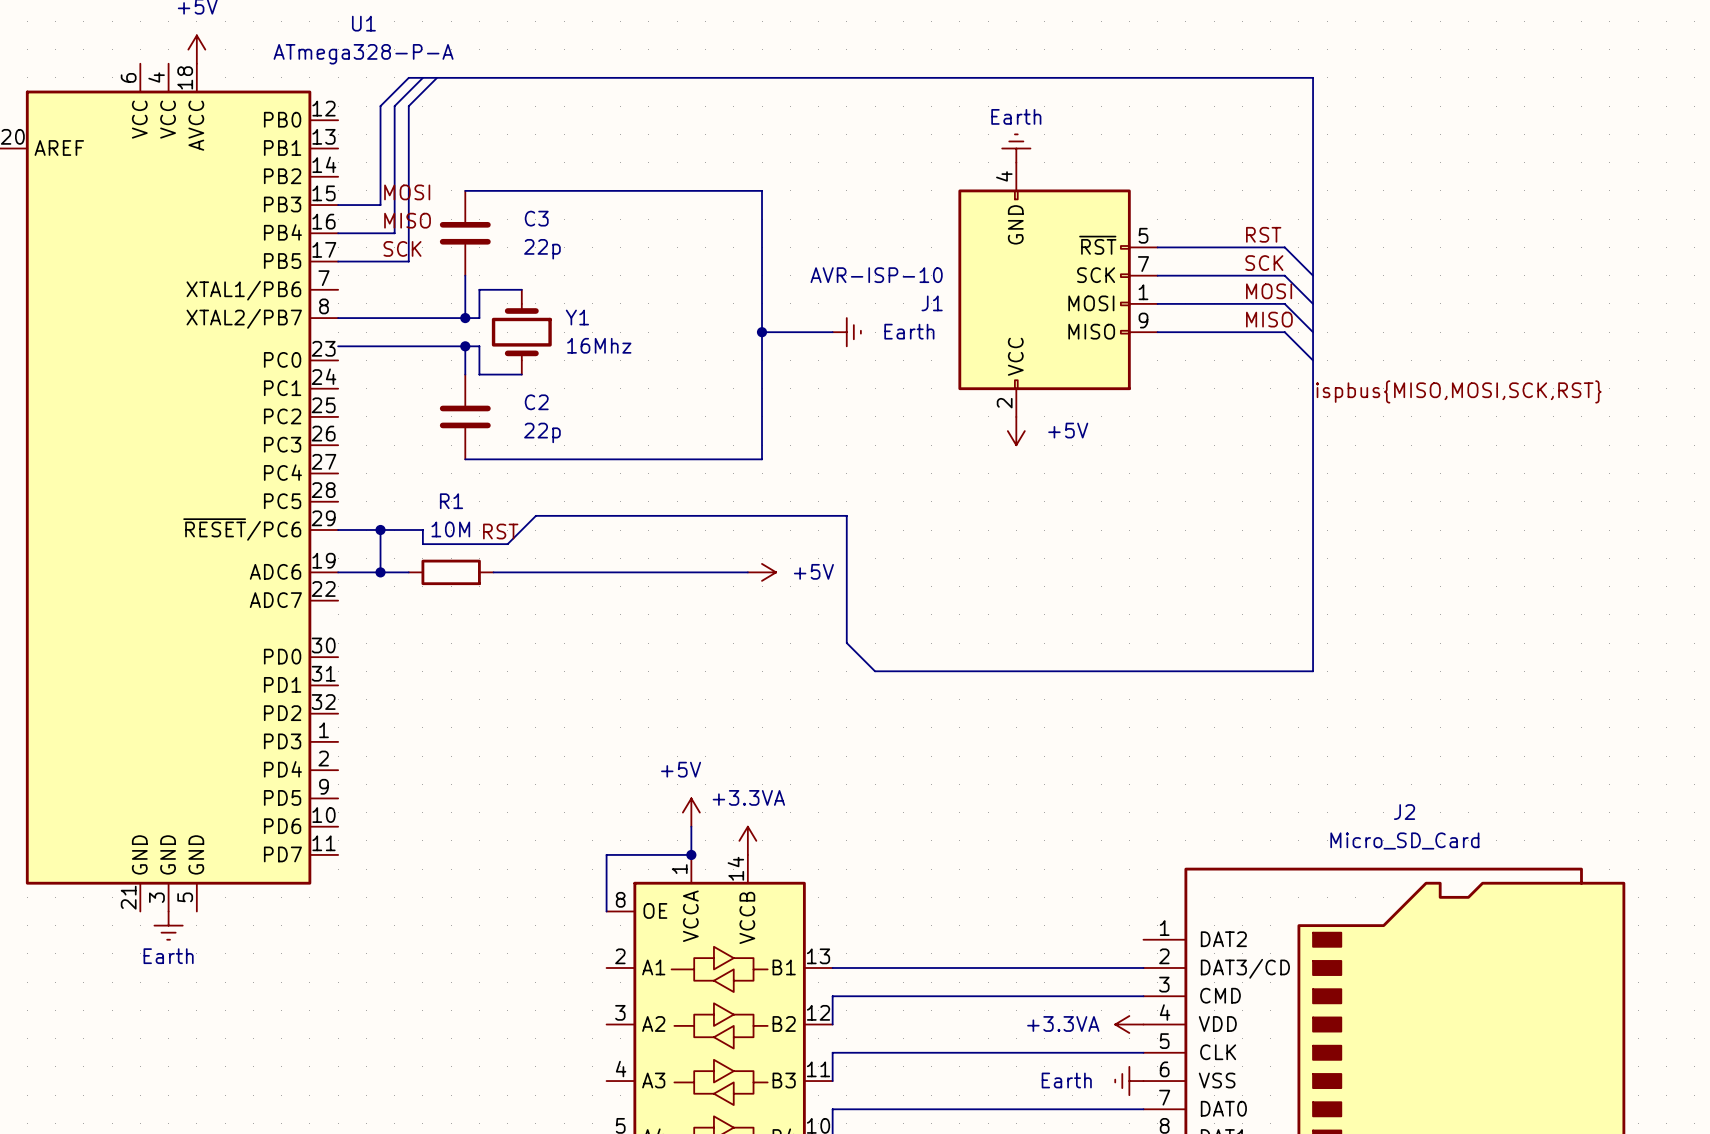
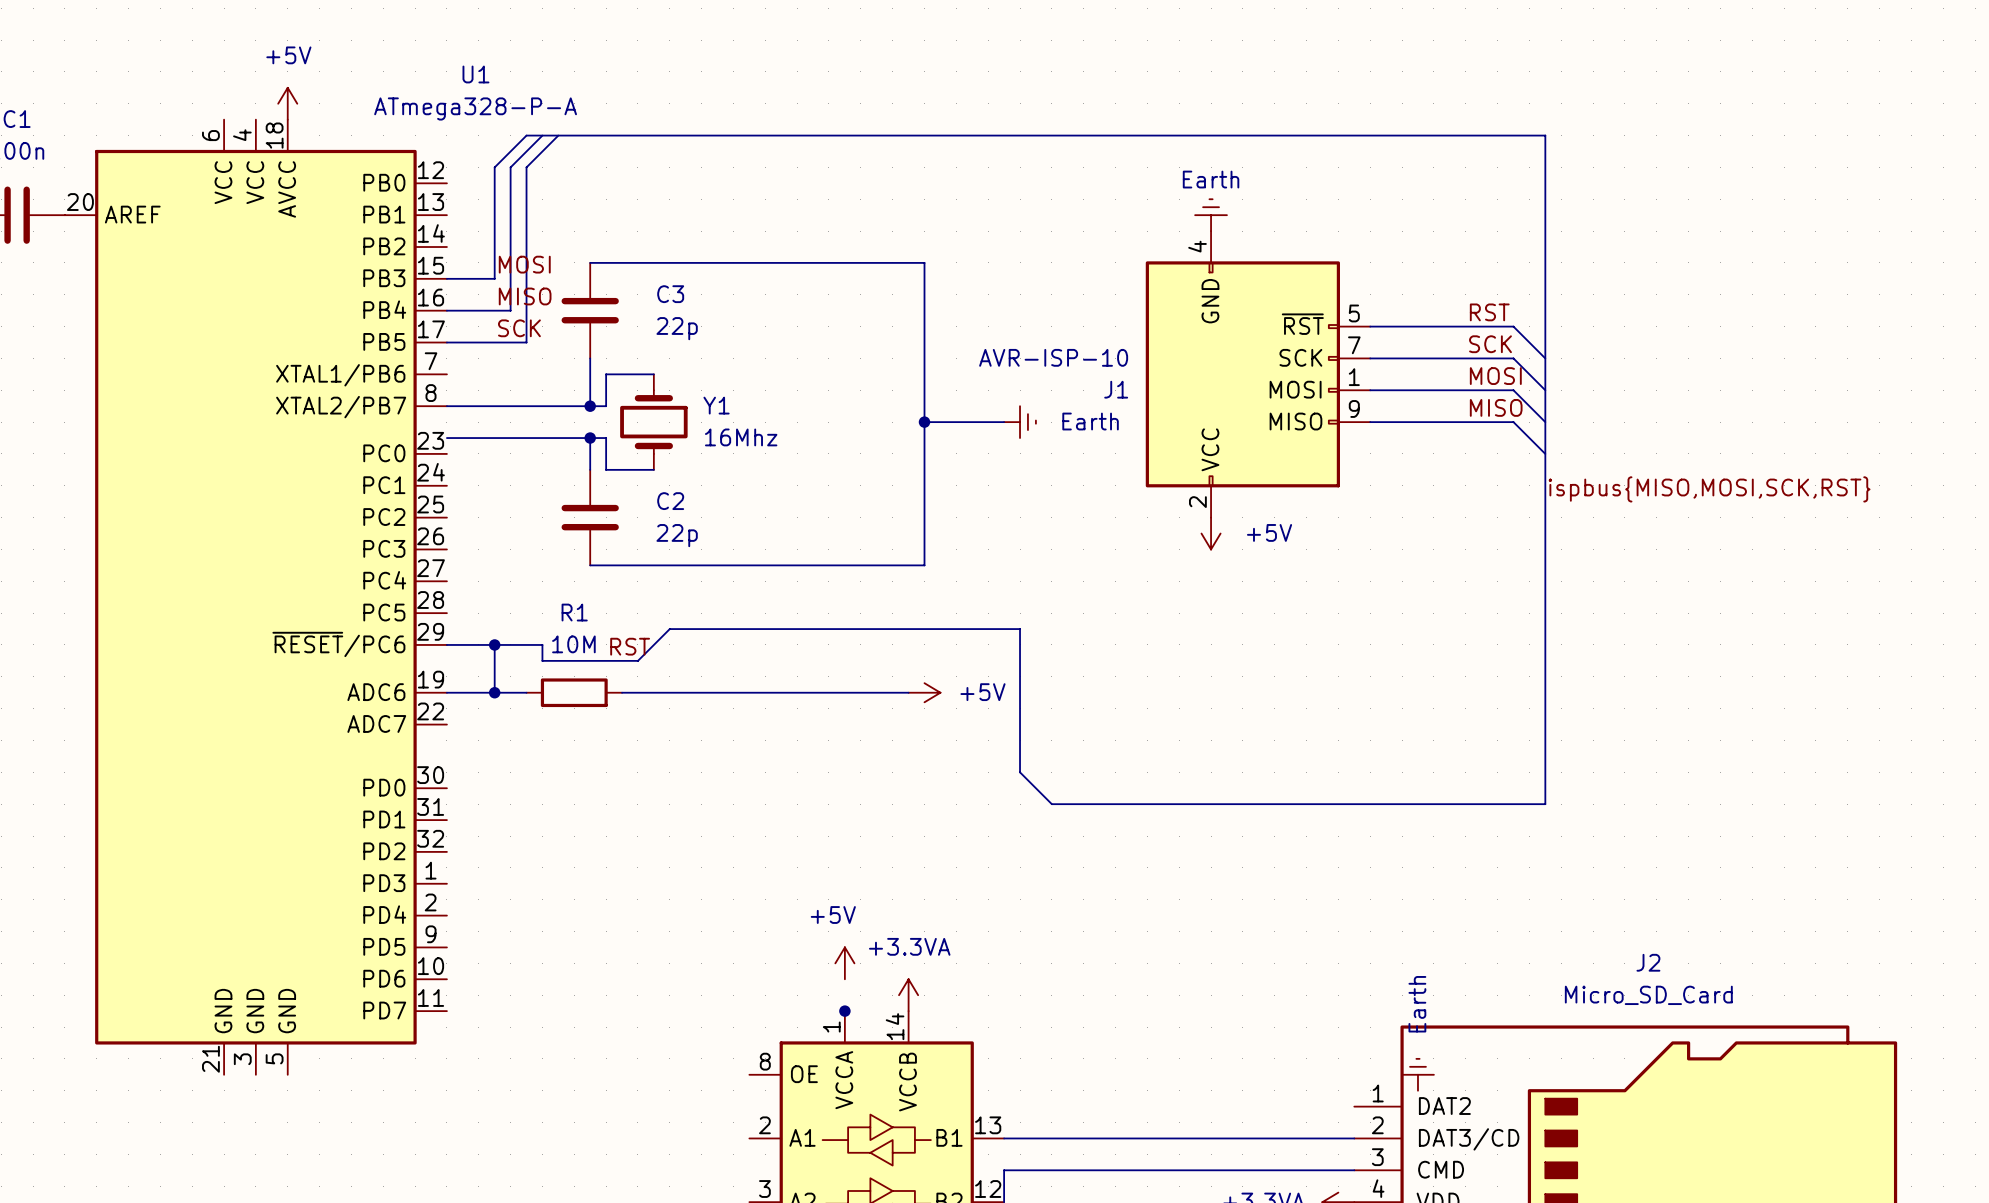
wire: (691, 826) (691, 854) (606, 854) (606, 911) -> none
power symbol: none -> Earth (1417, 1074)
power symbol: Earth (168, 925) -> none

